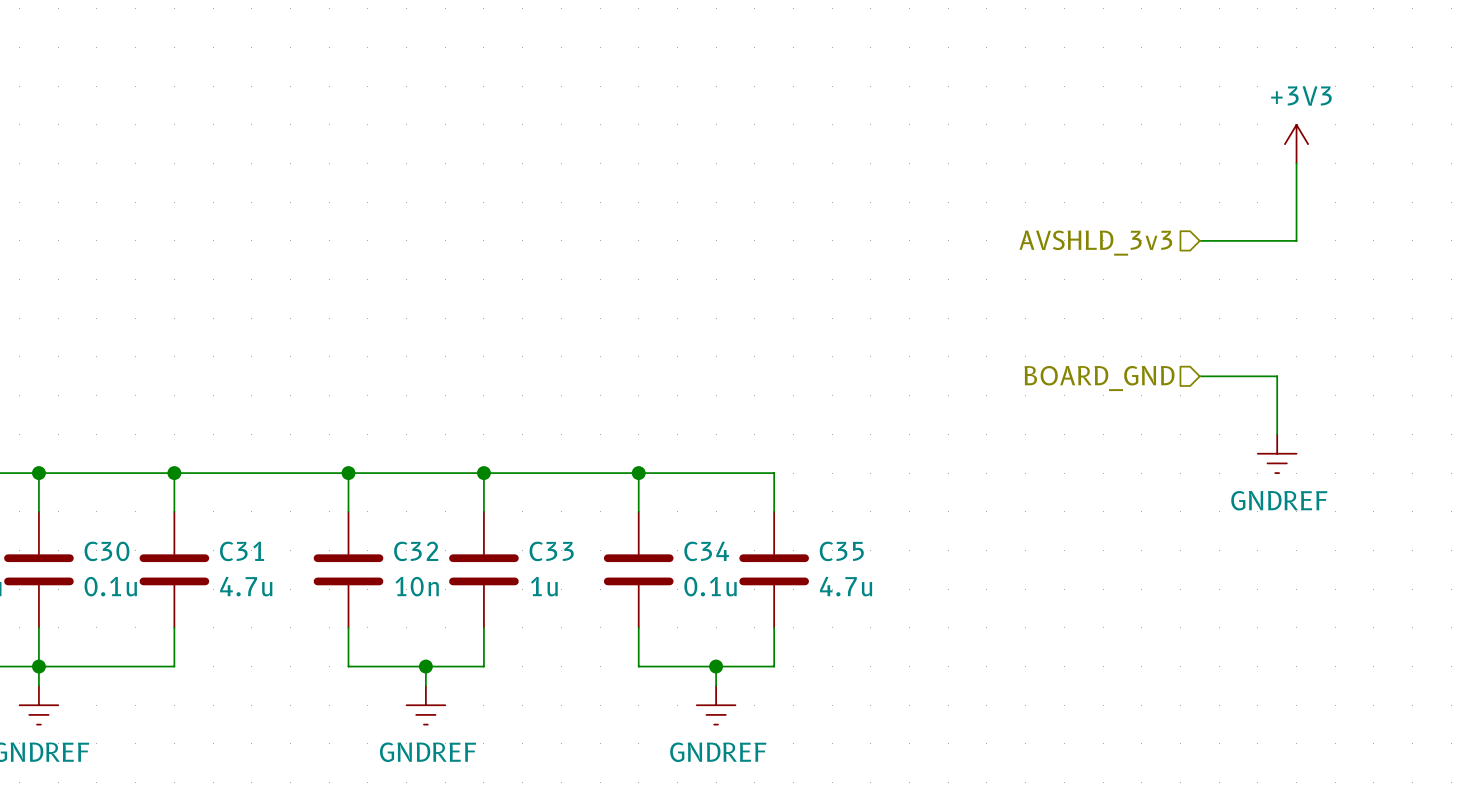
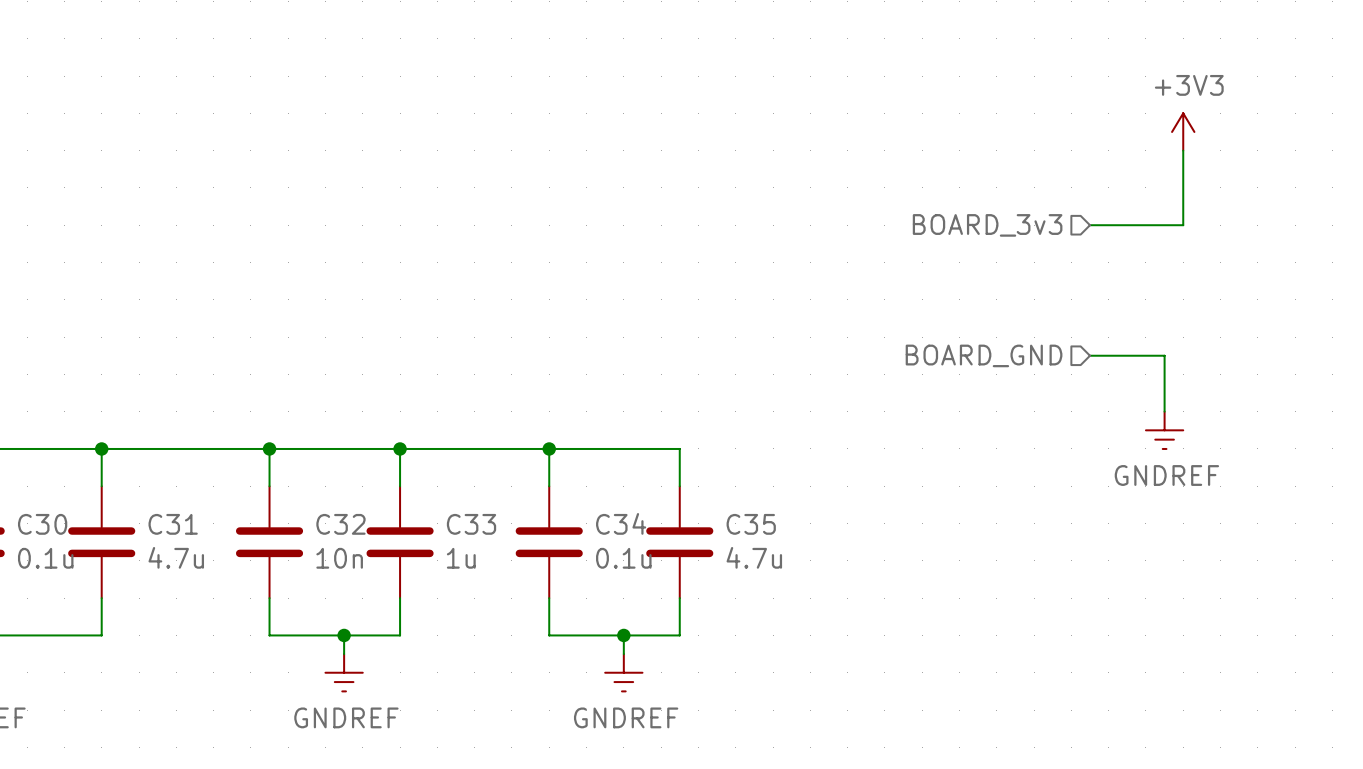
hierarchical label: AVSHLD_3v3 (1095, 243) -> BOARD_3v3 (987, 225)

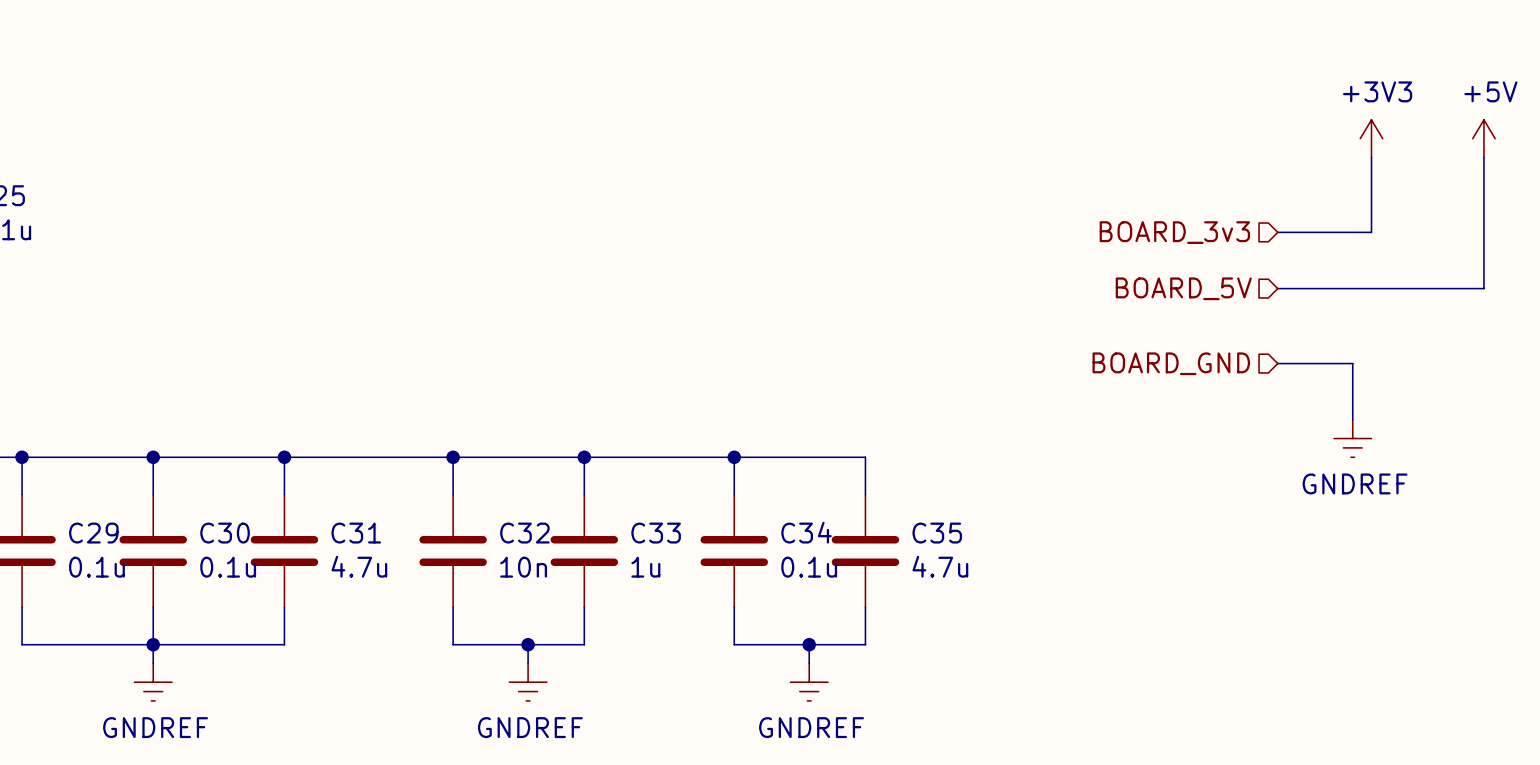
power symbol: none -> +5V (1483, 138)
wire: none -> (1483, 157) (1483, 288) (1277, 288)
hierarchical label: none -> BOARD_5V (1183, 288)

